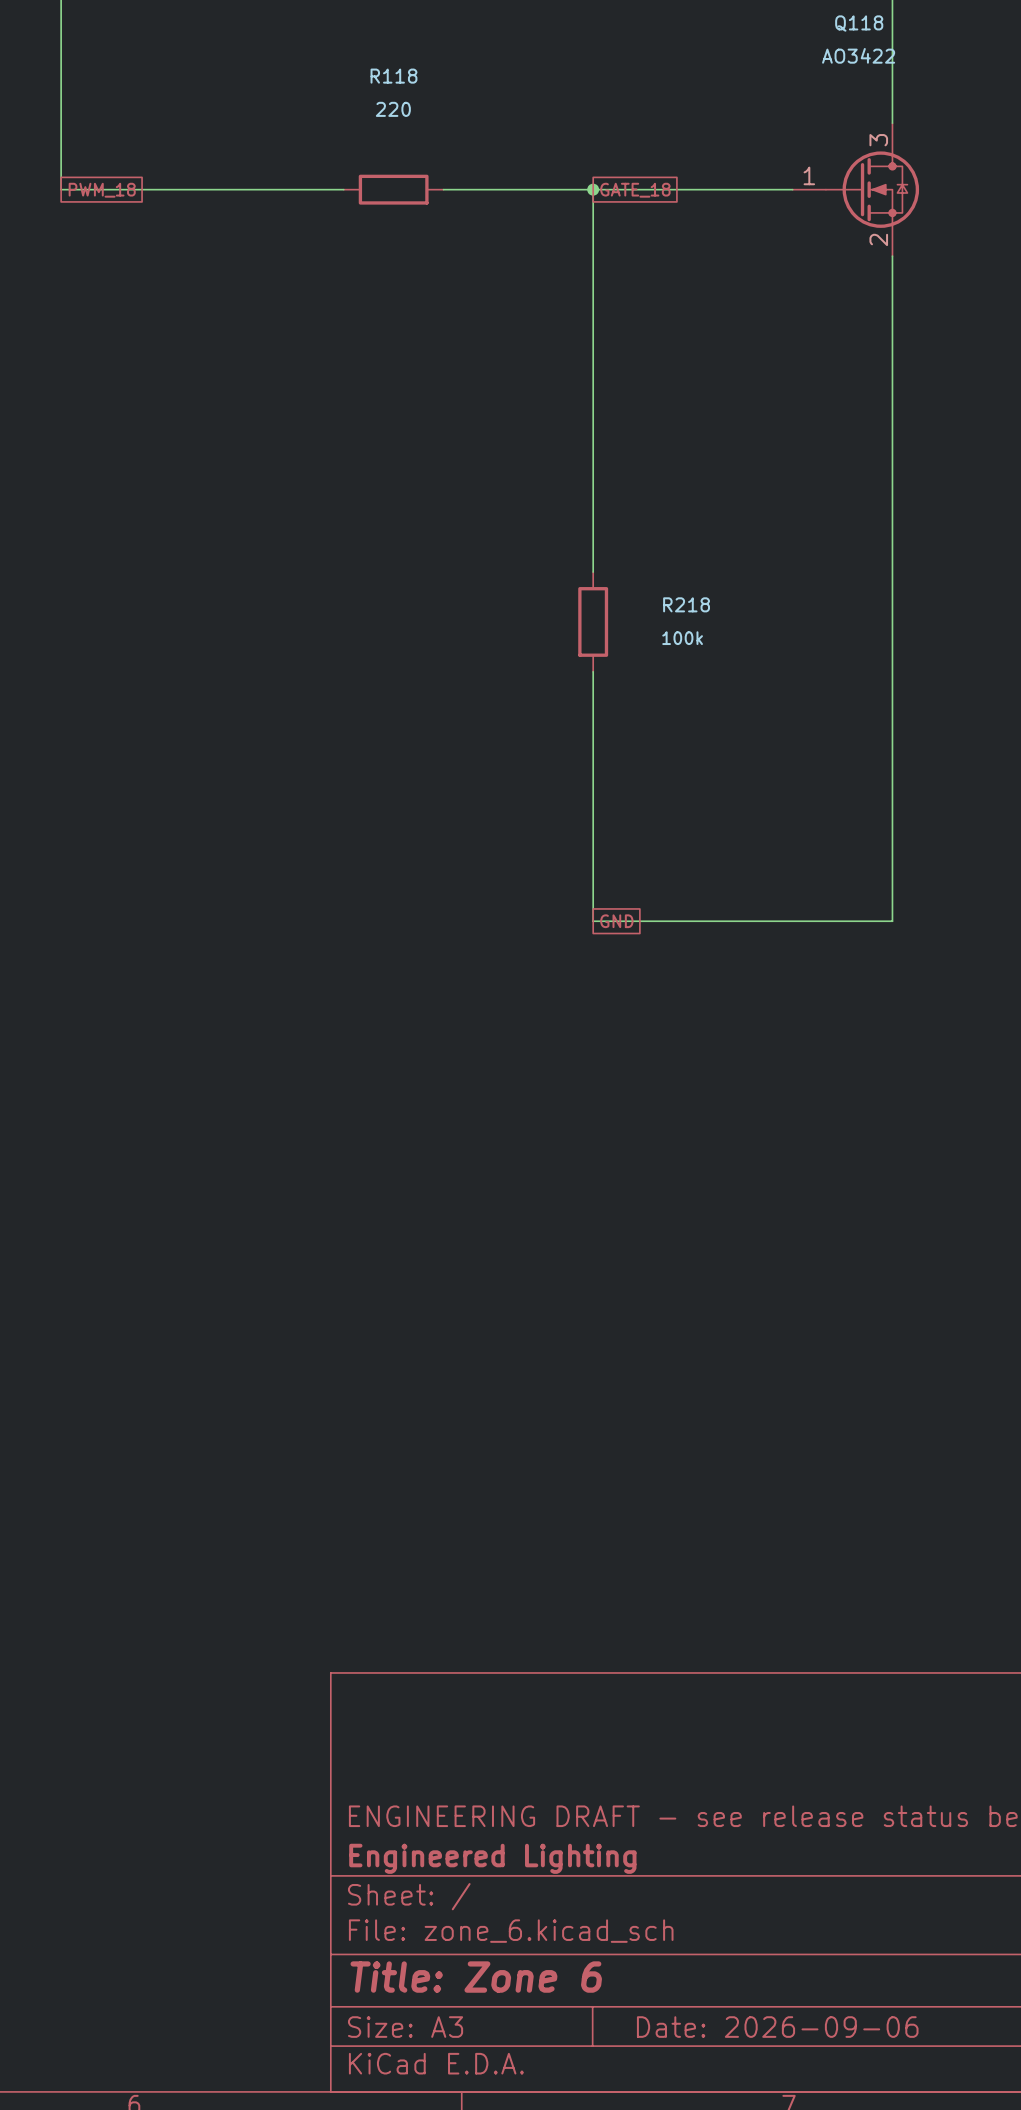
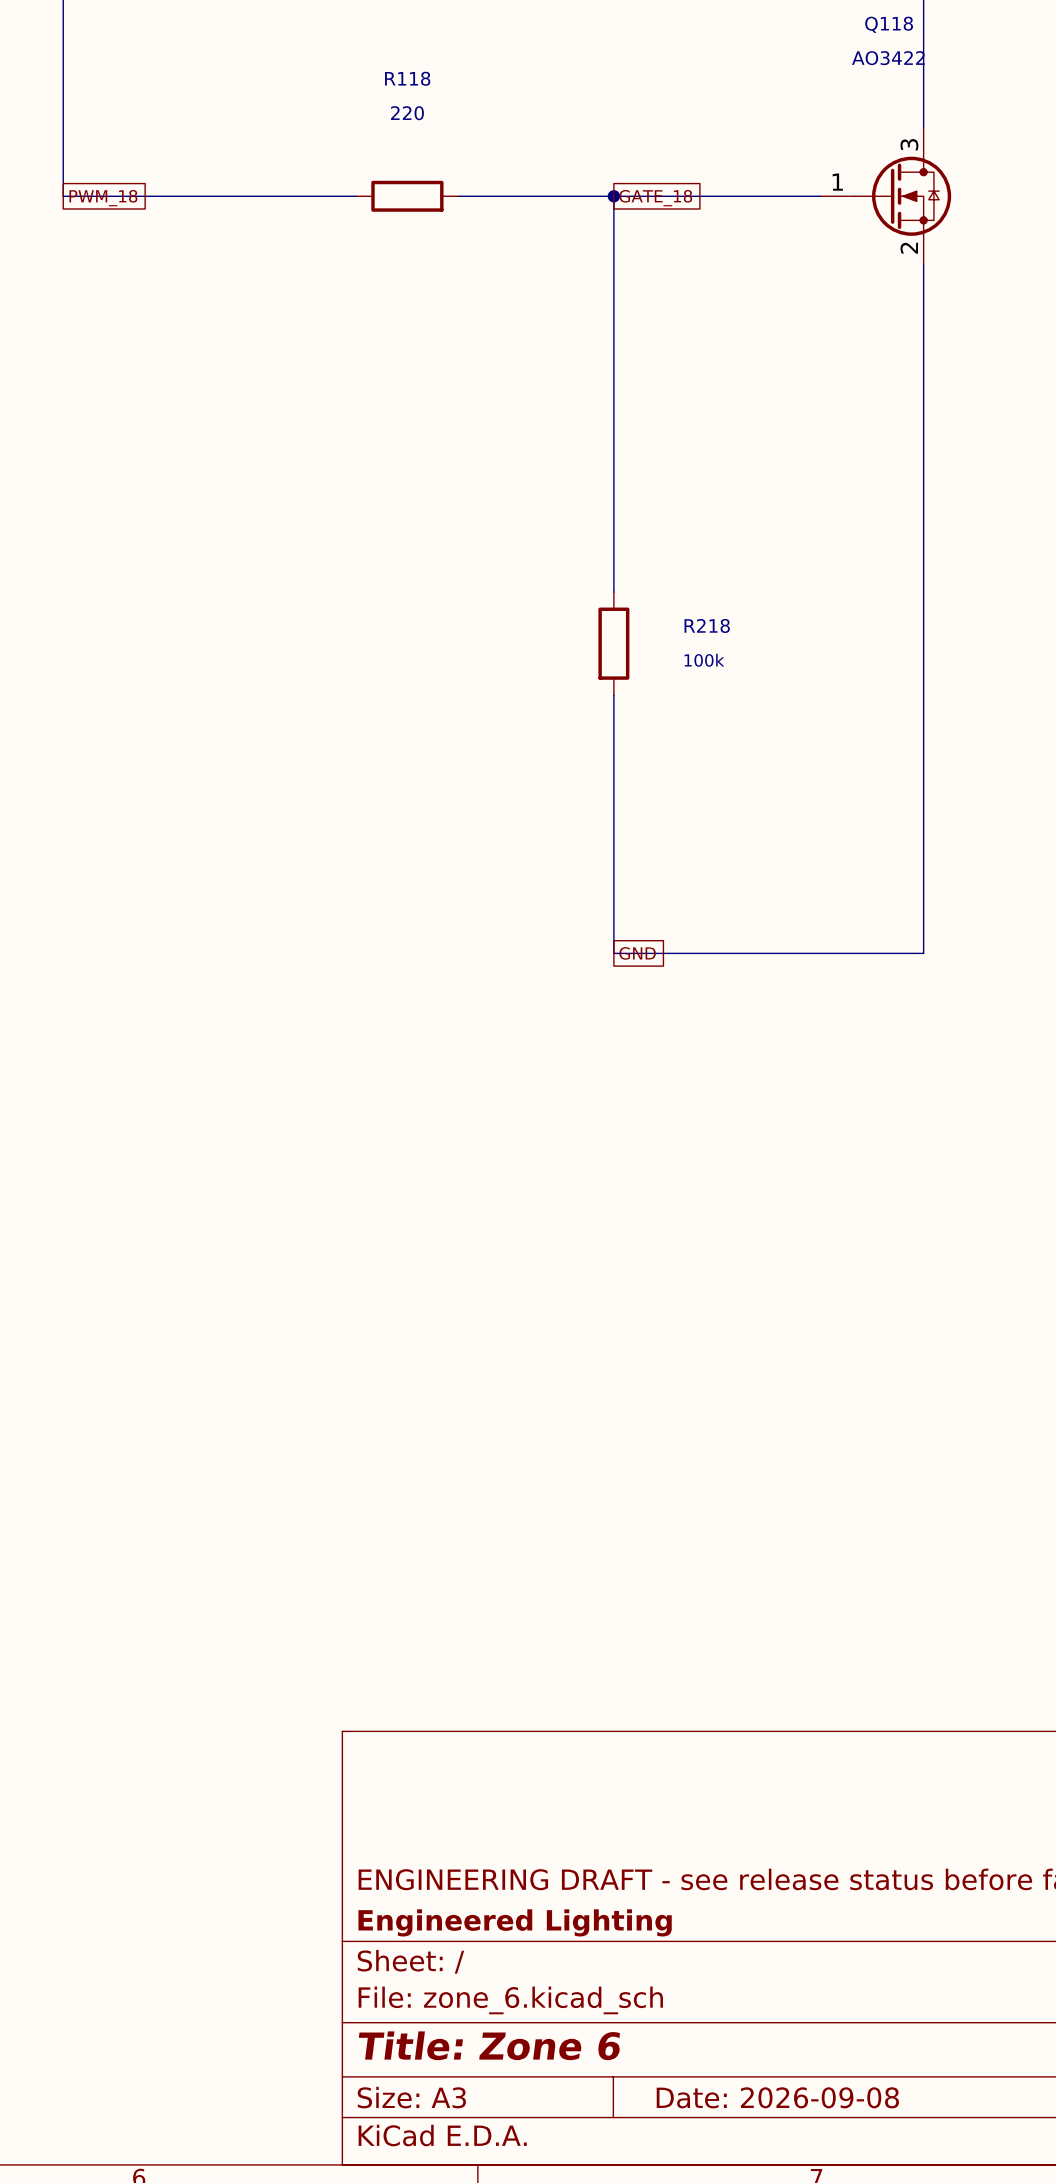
title block: Date: 2026-09-06 (777, 2027) -> Date: 2026-09-08 (777, 2097)

